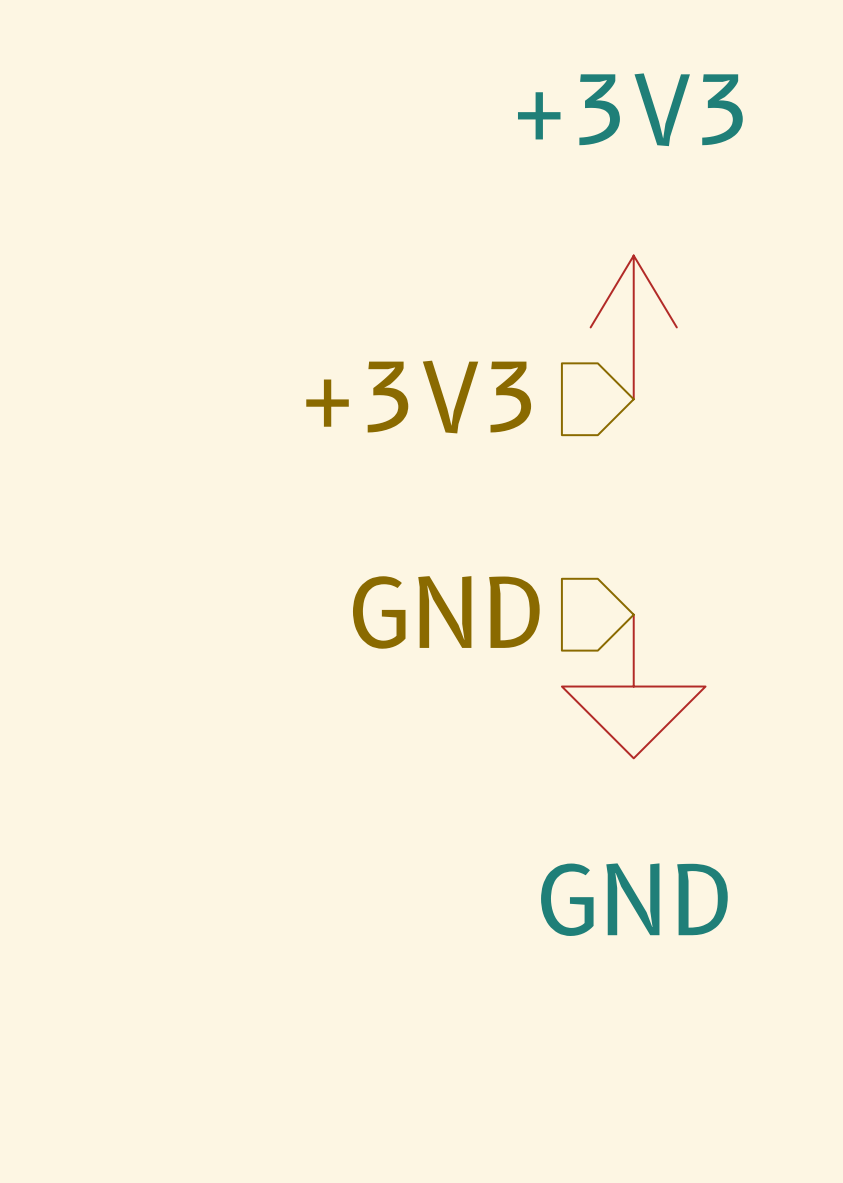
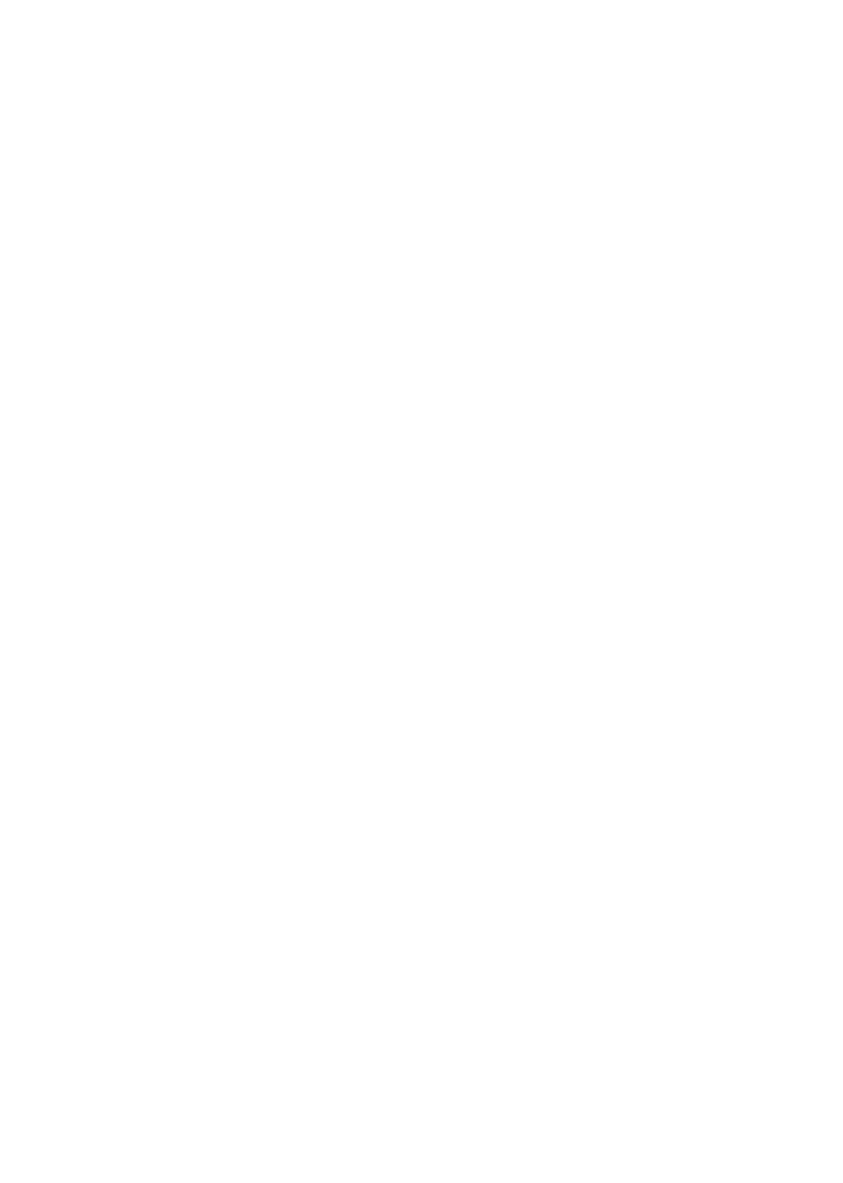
power symbol: +3V3 (633, 327) -> none
hierarchical label: +3V3 (418, 397) -> none
hierarchical label: GND (446, 612) -> none
power symbol: GND (633, 686) -> none

